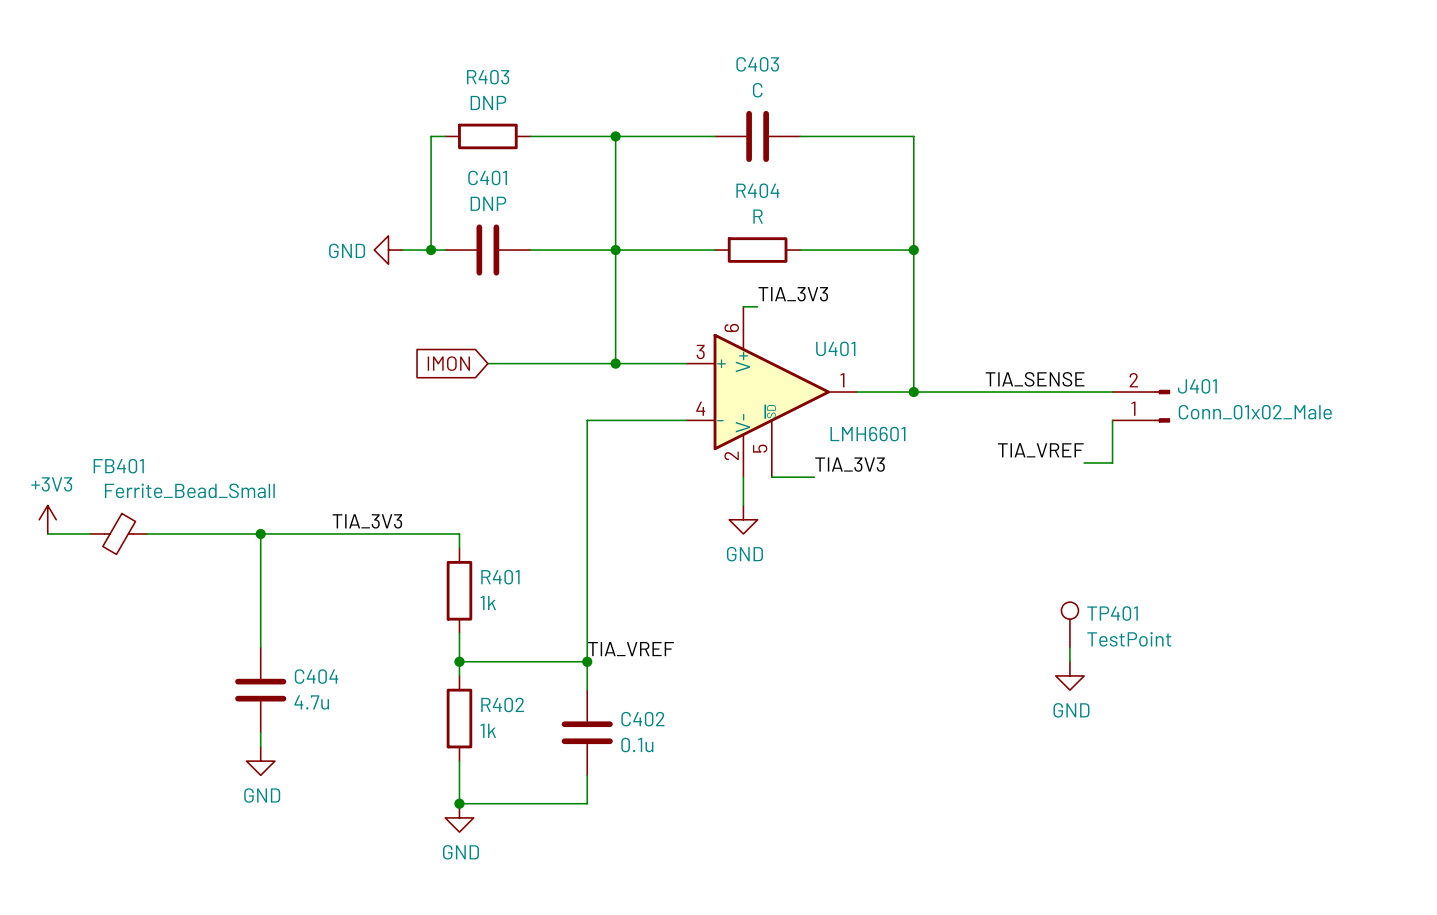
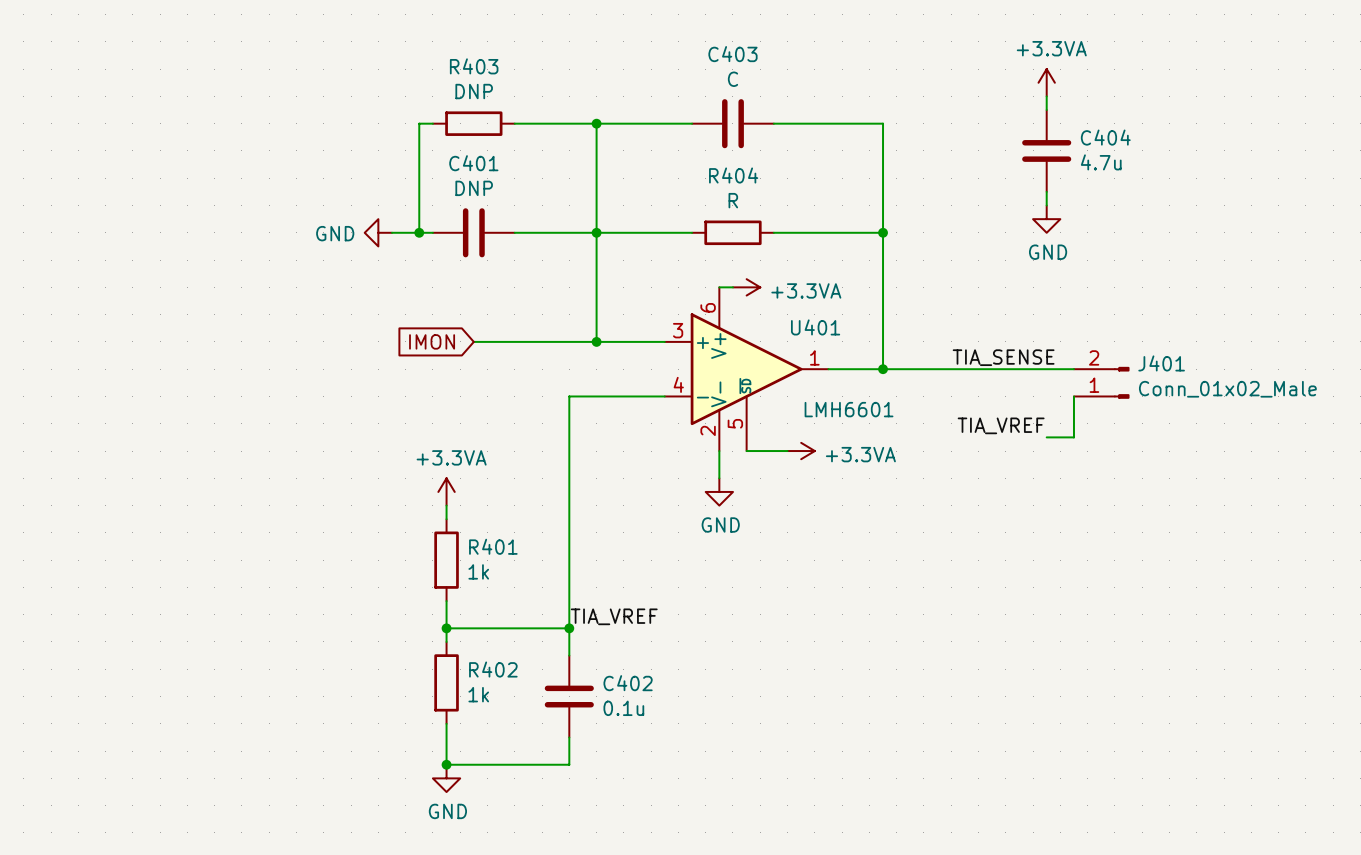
power symbol: none -> +3.3VA (1046, 82)
wire: none -> (1046, 96) (1046, 110)
wire: none -> (1046, 191) (1046, 205)
power symbol: none -> GND (1046, 219)
label: TIA_3V3 (793, 294) -> none
power symbol: none -> +3.3VA (746, 287)
label: TIA_3V3 (850, 464) -> none
power symbol: none -> +3.3VA (801, 451)
power symbol: +3V3 (47, 519) -> none
power symbol: none -> +3.3VA (446, 491)
label: TIA_3V3 (367, 521) -> none
wire: (47, 533) (90, 533) -> none
FB401: Ferrite_Bead_Small (118, 533) -> none
wire: (147, 533) (459, 533) -> none
wire: (260, 533) (260, 647) -> none
junction: (260, 533) -> none
TP401: TestPoint (1069, 624) -> none
wire: (1069, 647) (1069, 661) -> none
power symbol: GND (1069, 675) -> none
C404 position: (260, 690) -> (1046, 150)
wire: (260, 732) (260, 746) -> none
power symbol: GND (260, 761) -> none

